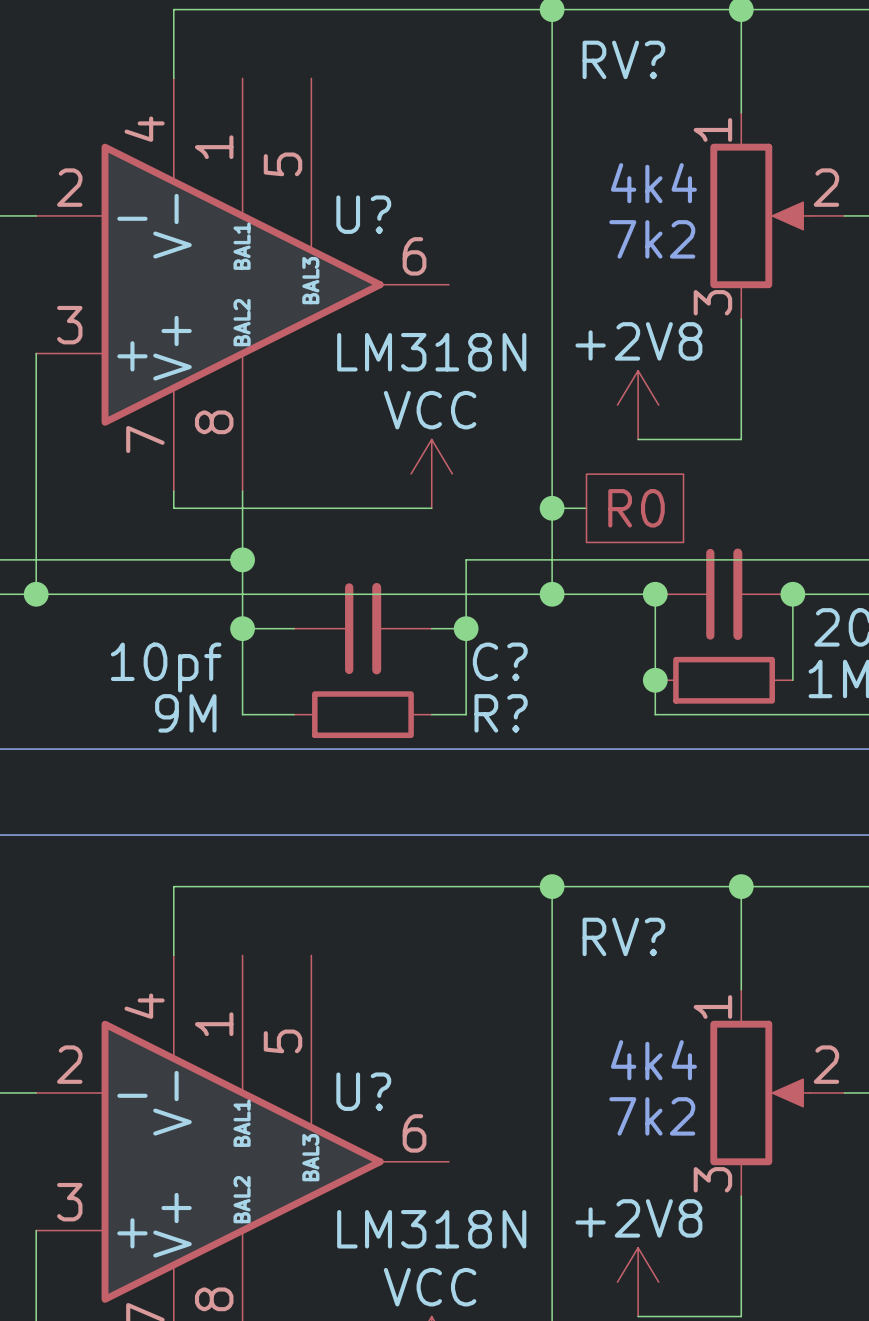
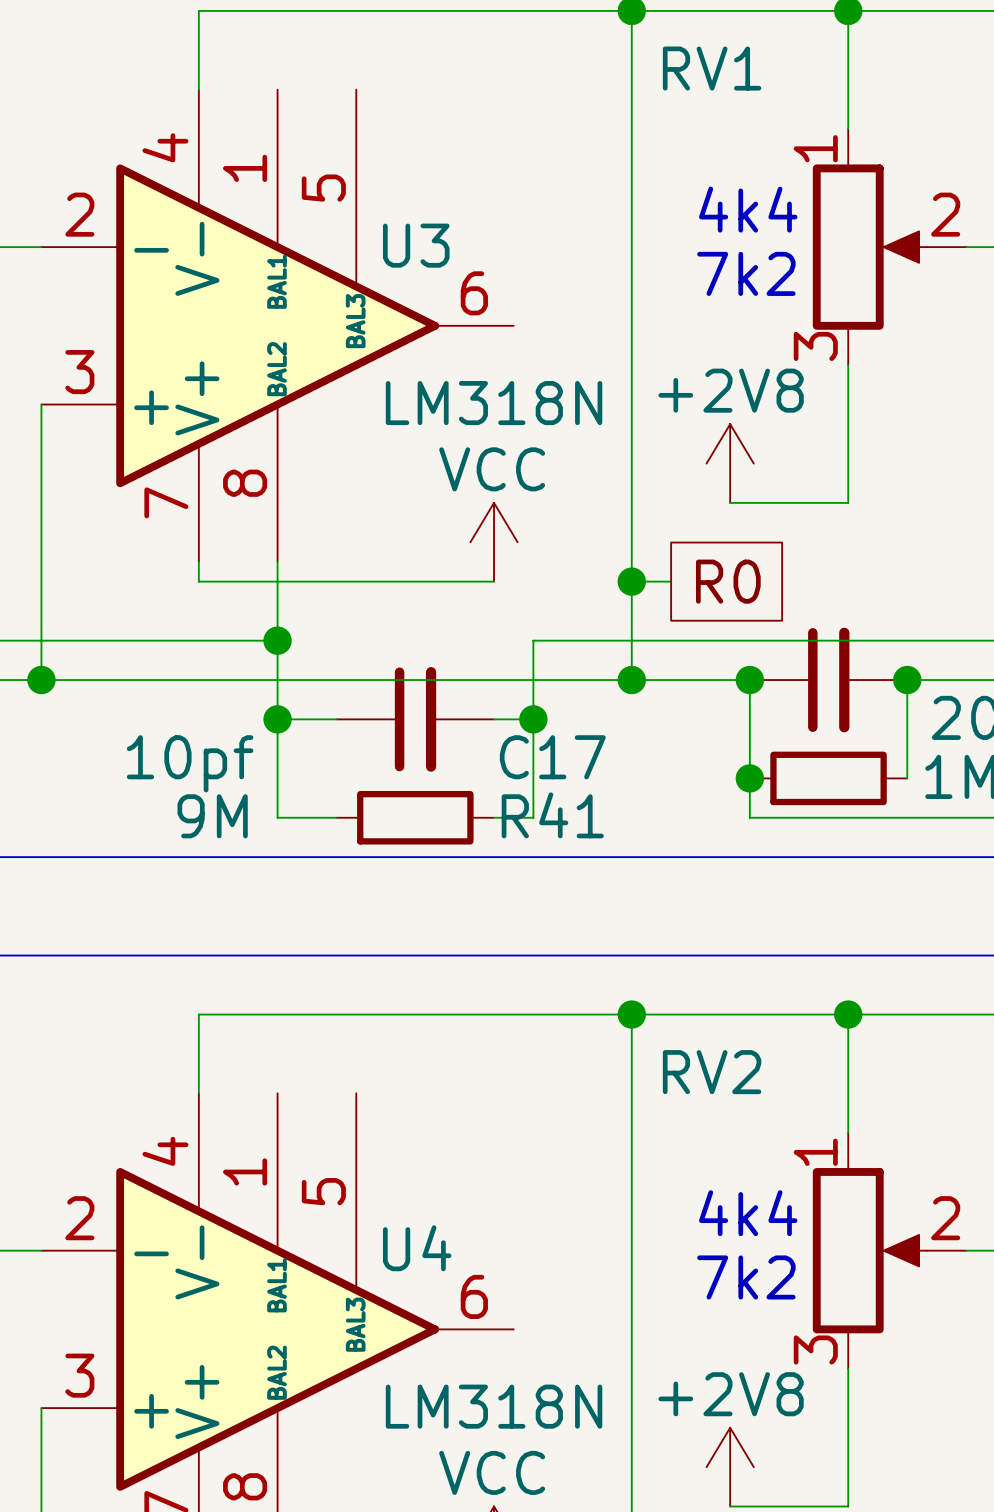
RV? name: RV? (623, 59) -> RV1 (712, 68)
U? name: U? (363, 214) -> U3 (416, 245)
C? name: C? (500, 661) -> C17 (552, 757)
R? name: R? (501, 713) -> R41 (552, 815)
RV? name: RV? (623, 936) -> RV2 (712, 1072)
U? name: U? (363, 1091) -> U4 (417, 1248)

